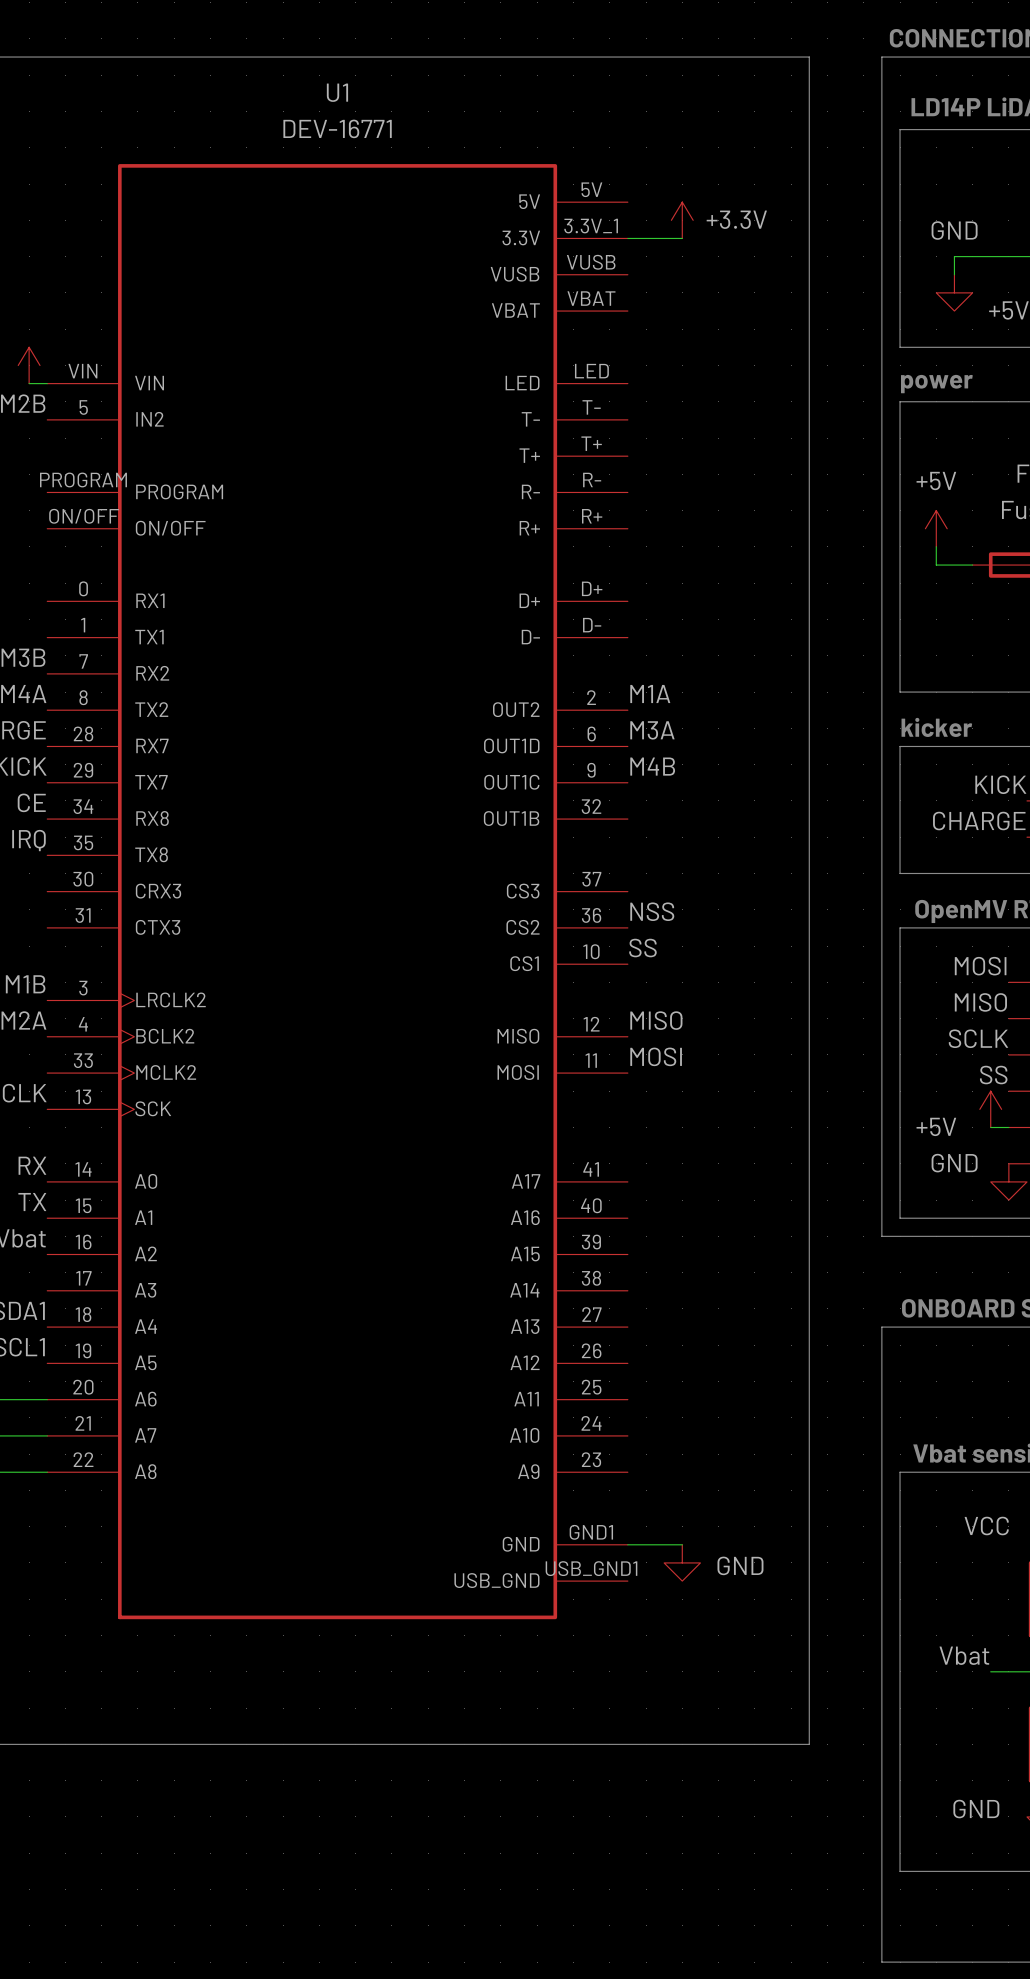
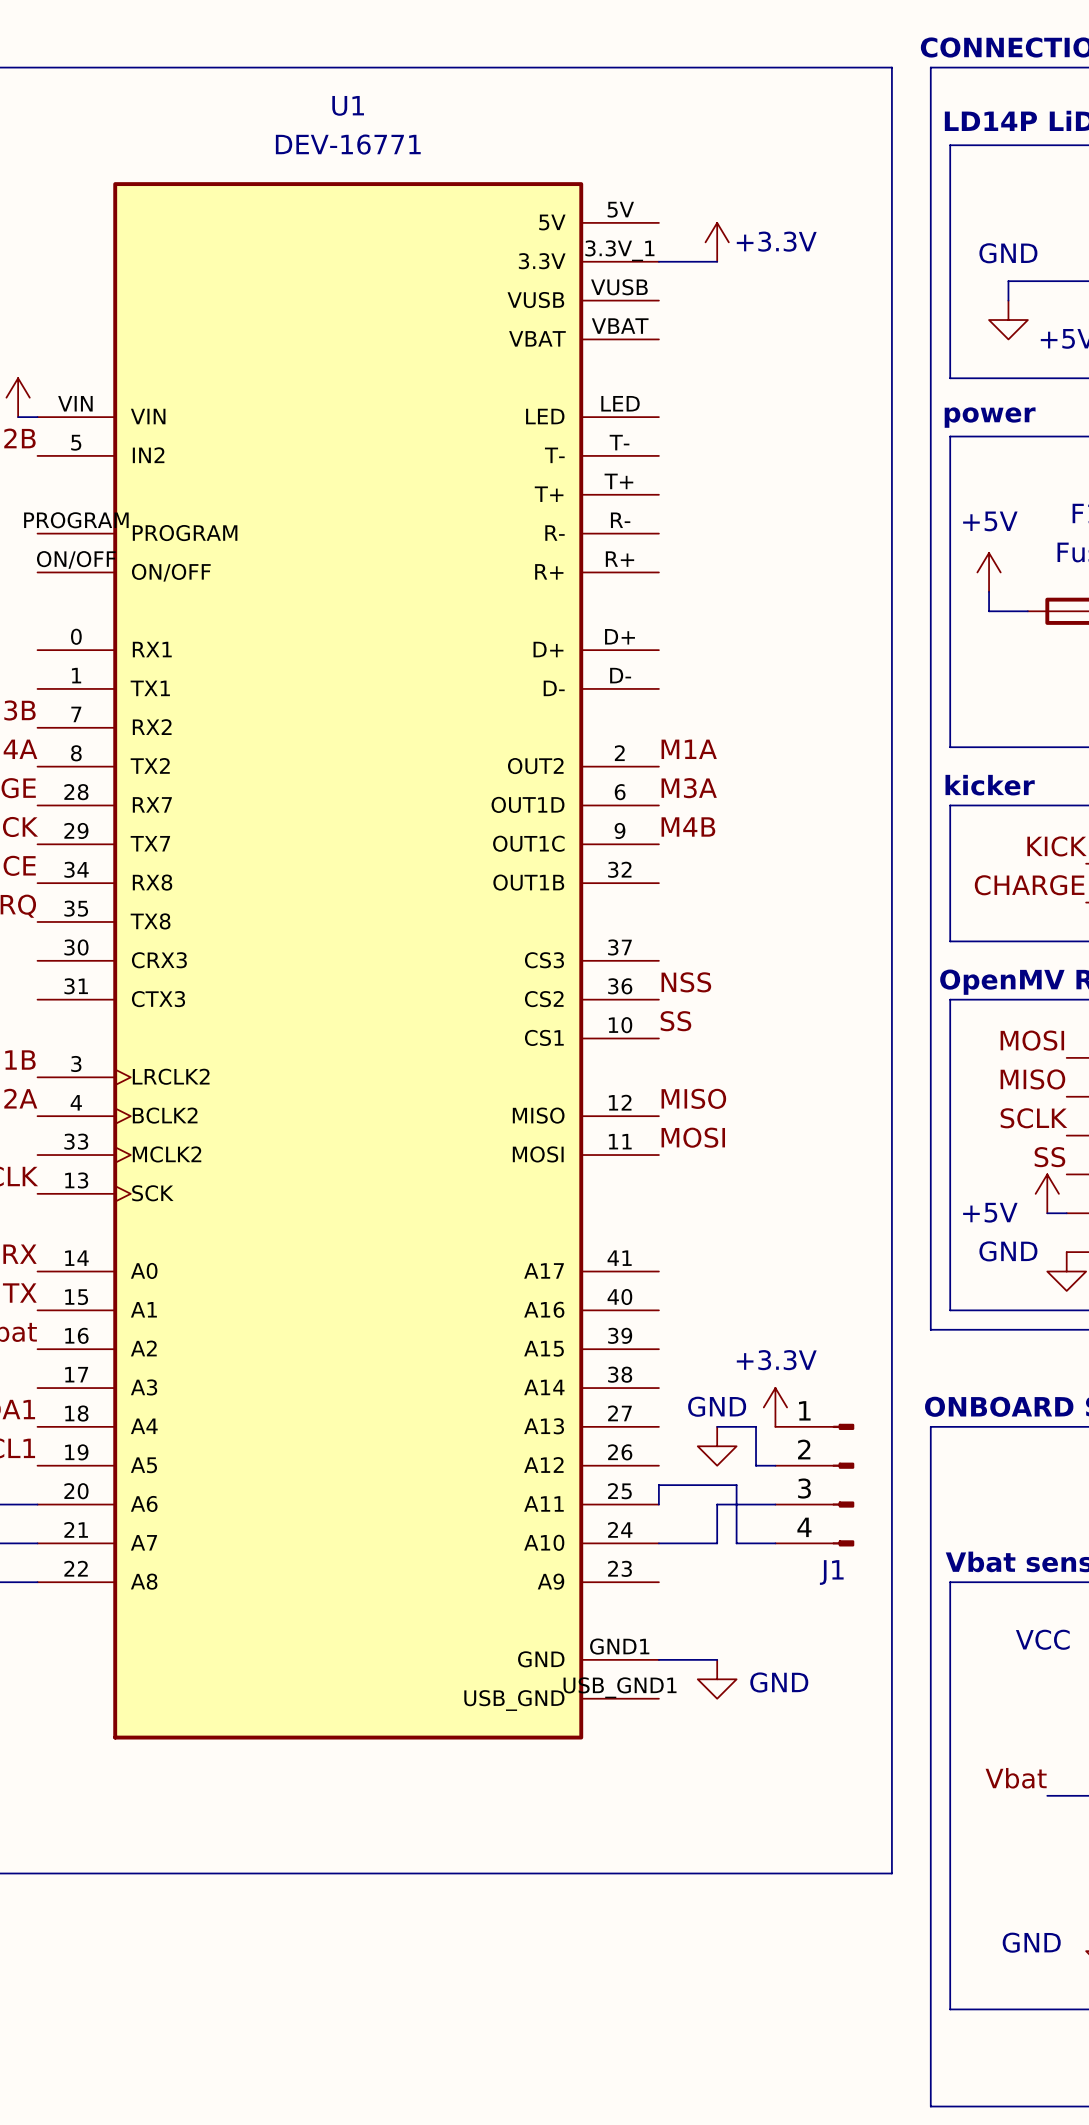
line: (809, 57) (809, 1744) -> (853, 67) (891, 67) (891, 1873) (853, 1873)
power symbol: none -> +3.3V (775, 1407)
wire: none -> (717, 1426) (756, 1426) (756, 1465) (775, 1465)
power symbol: none -> GND (717, 1446)
J1: none -> (814, 1485)
wire: none -> (658, 1504) (658, 1485) (736, 1485) (736, 1543) (775, 1543)
wire: none -> (775, 1504) (717, 1504) (717, 1543) (658, 1543)

